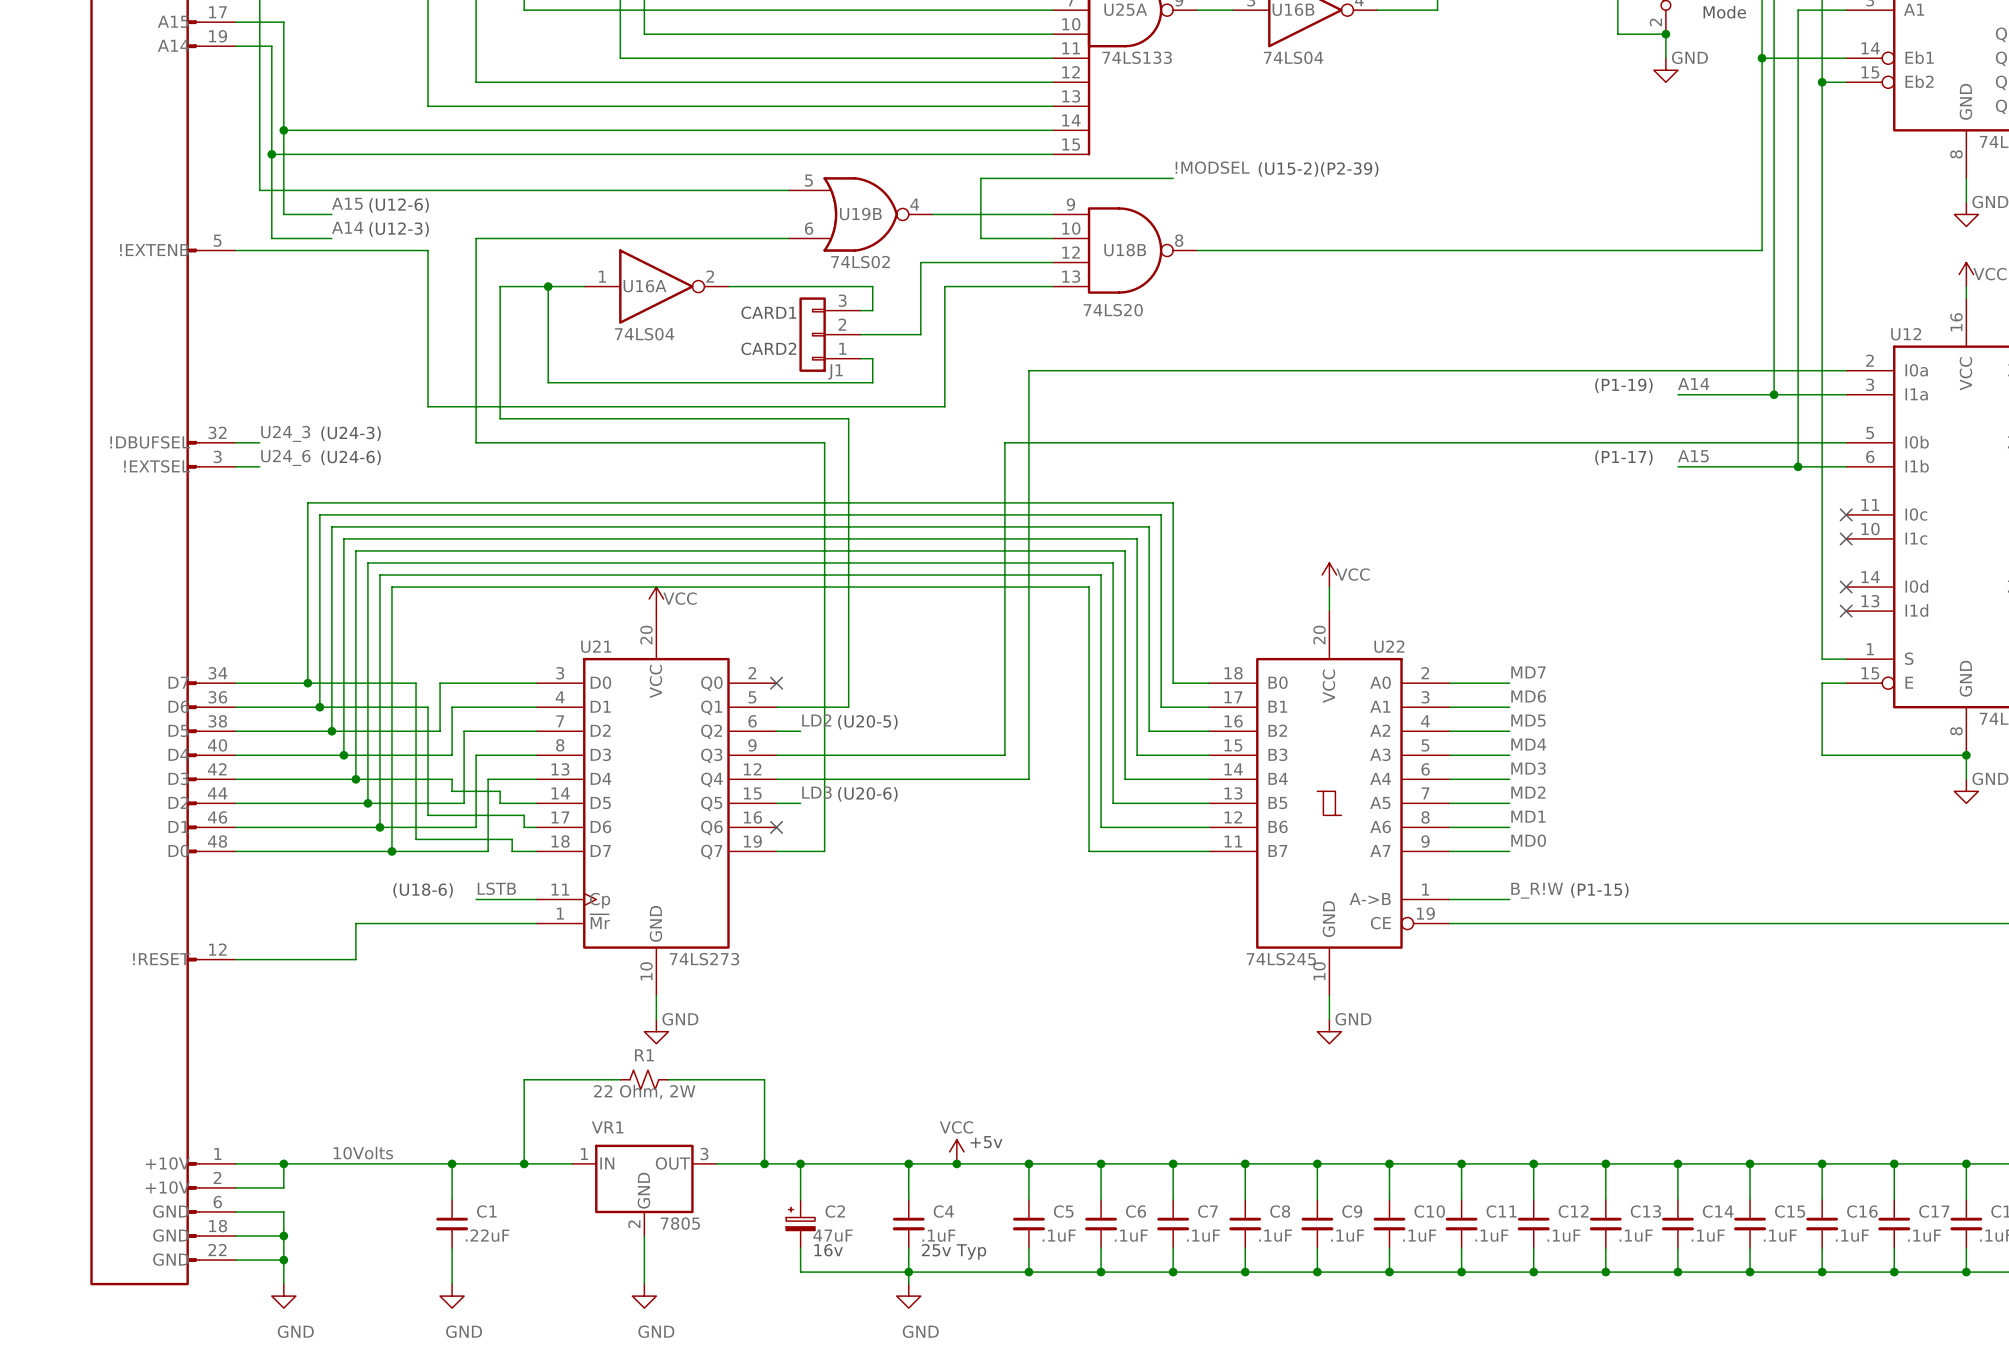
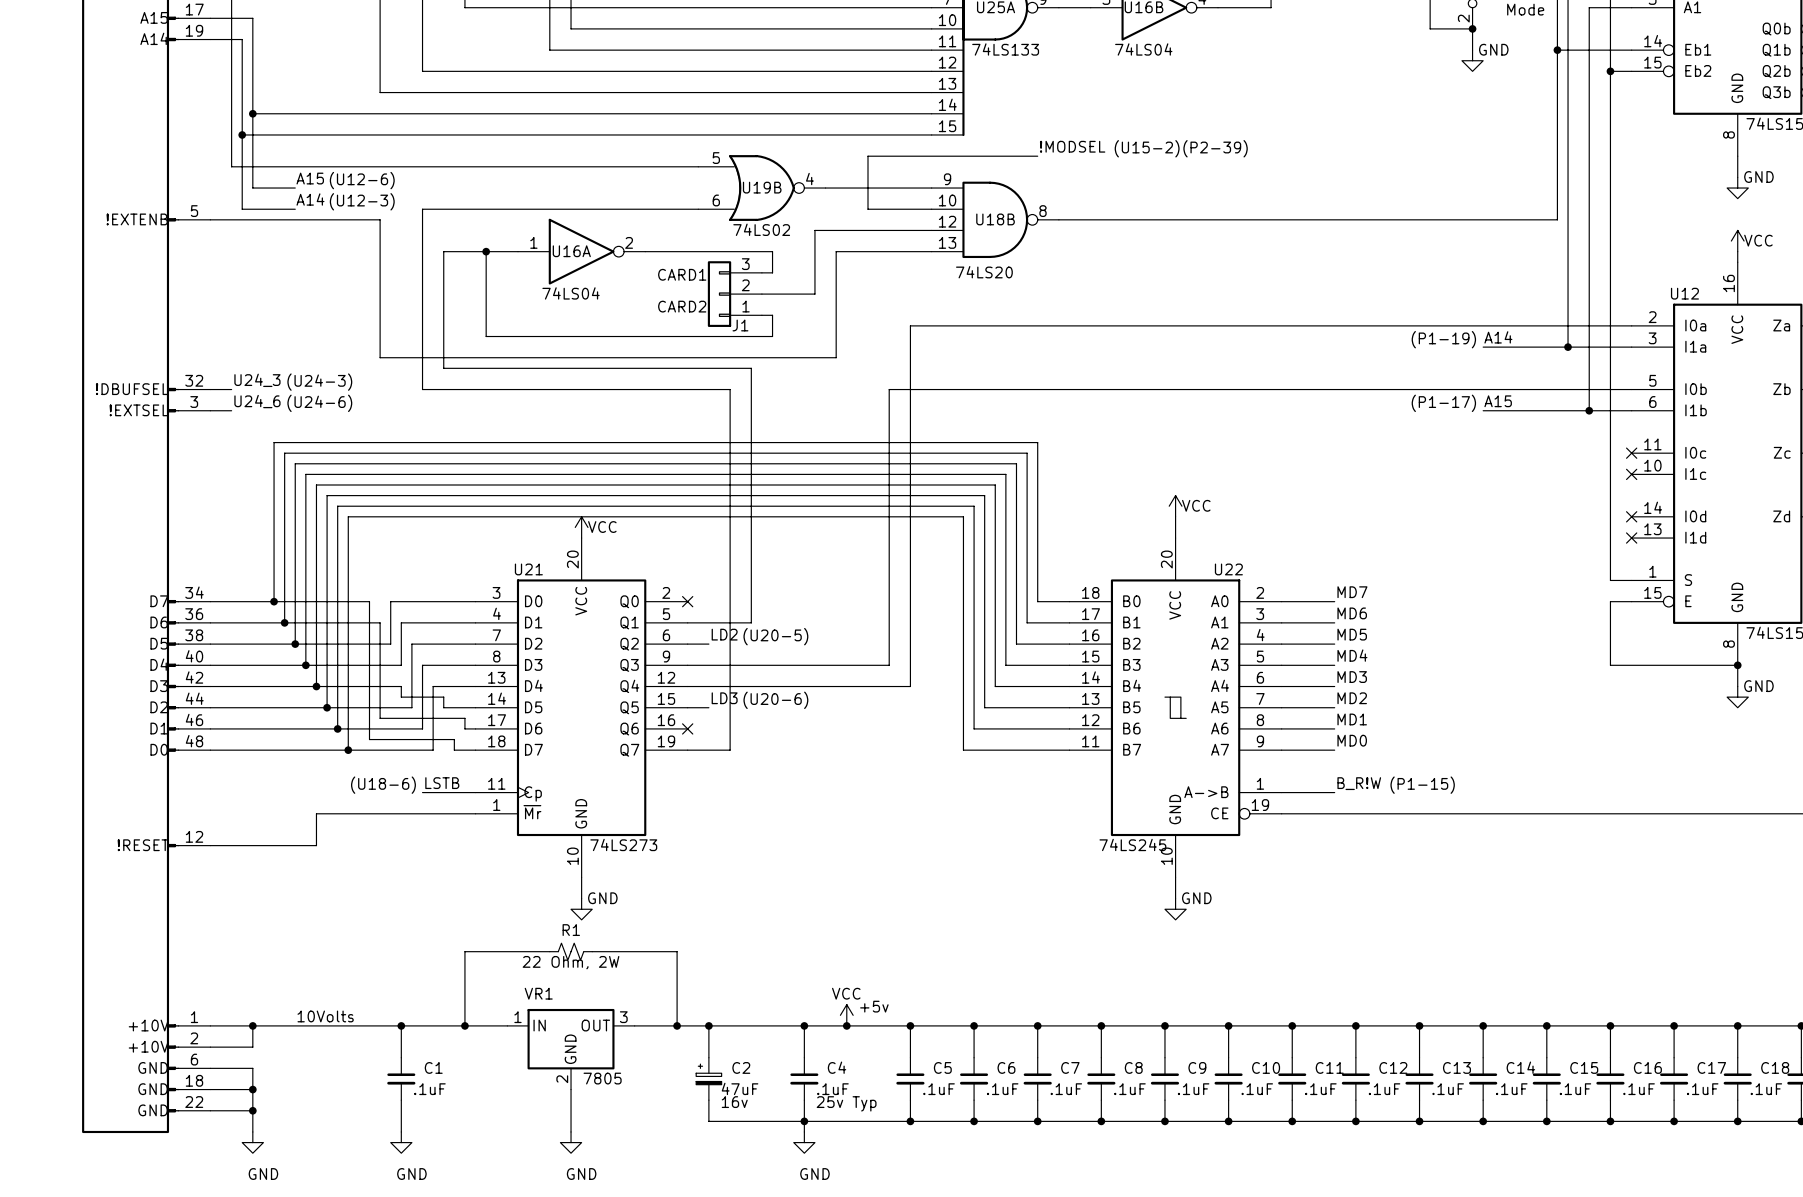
C1 value: .22uF (487, 1235) -> .1uF (429, 1089)

